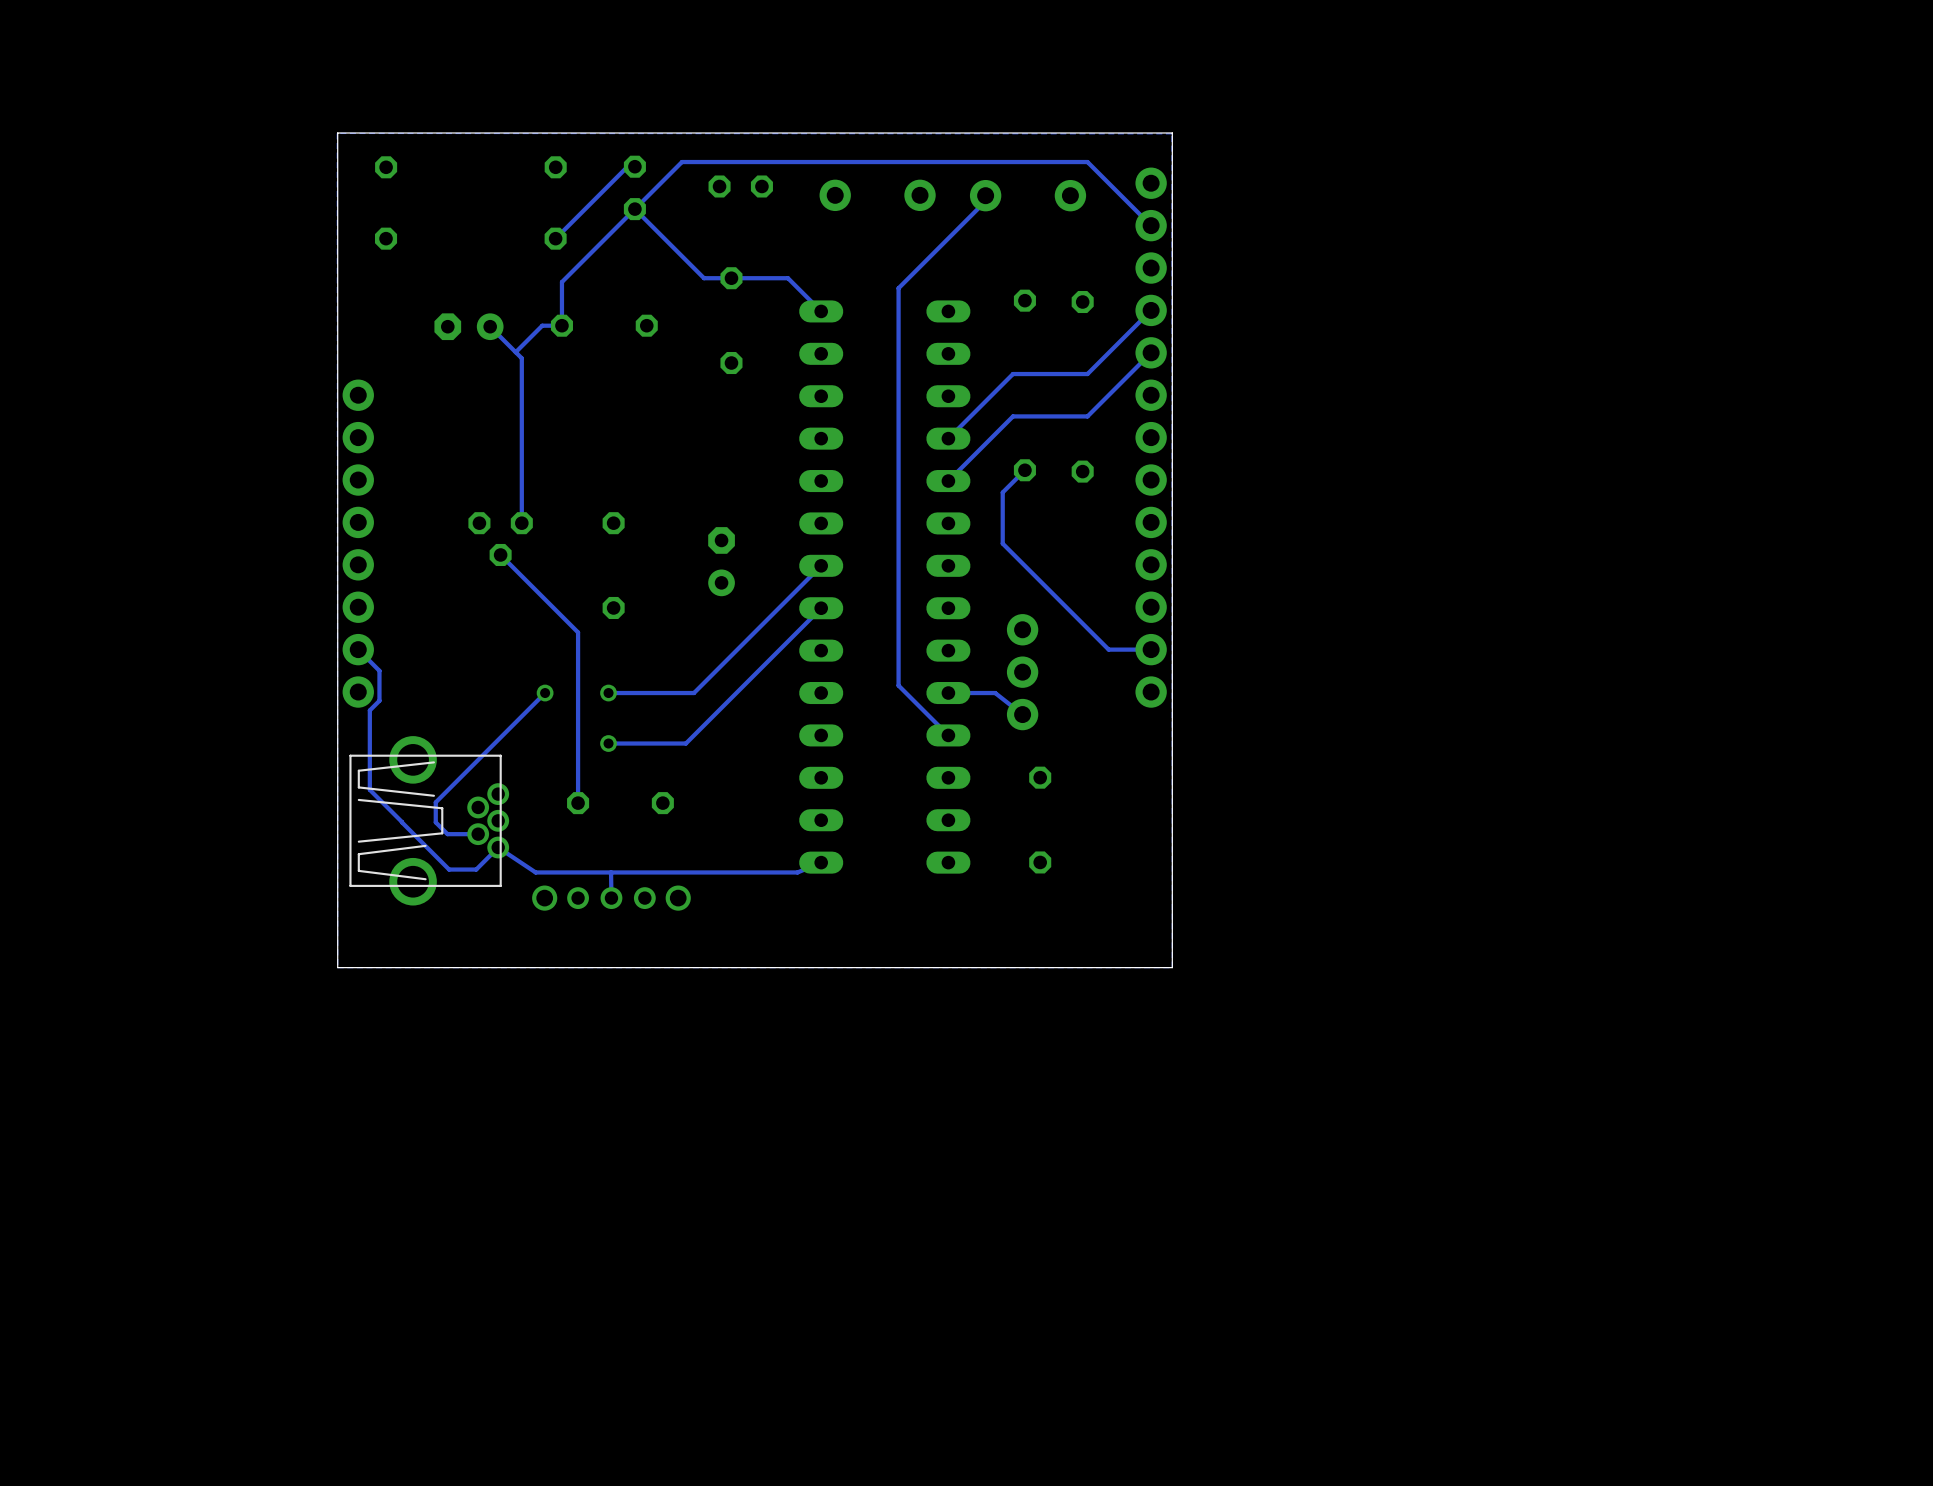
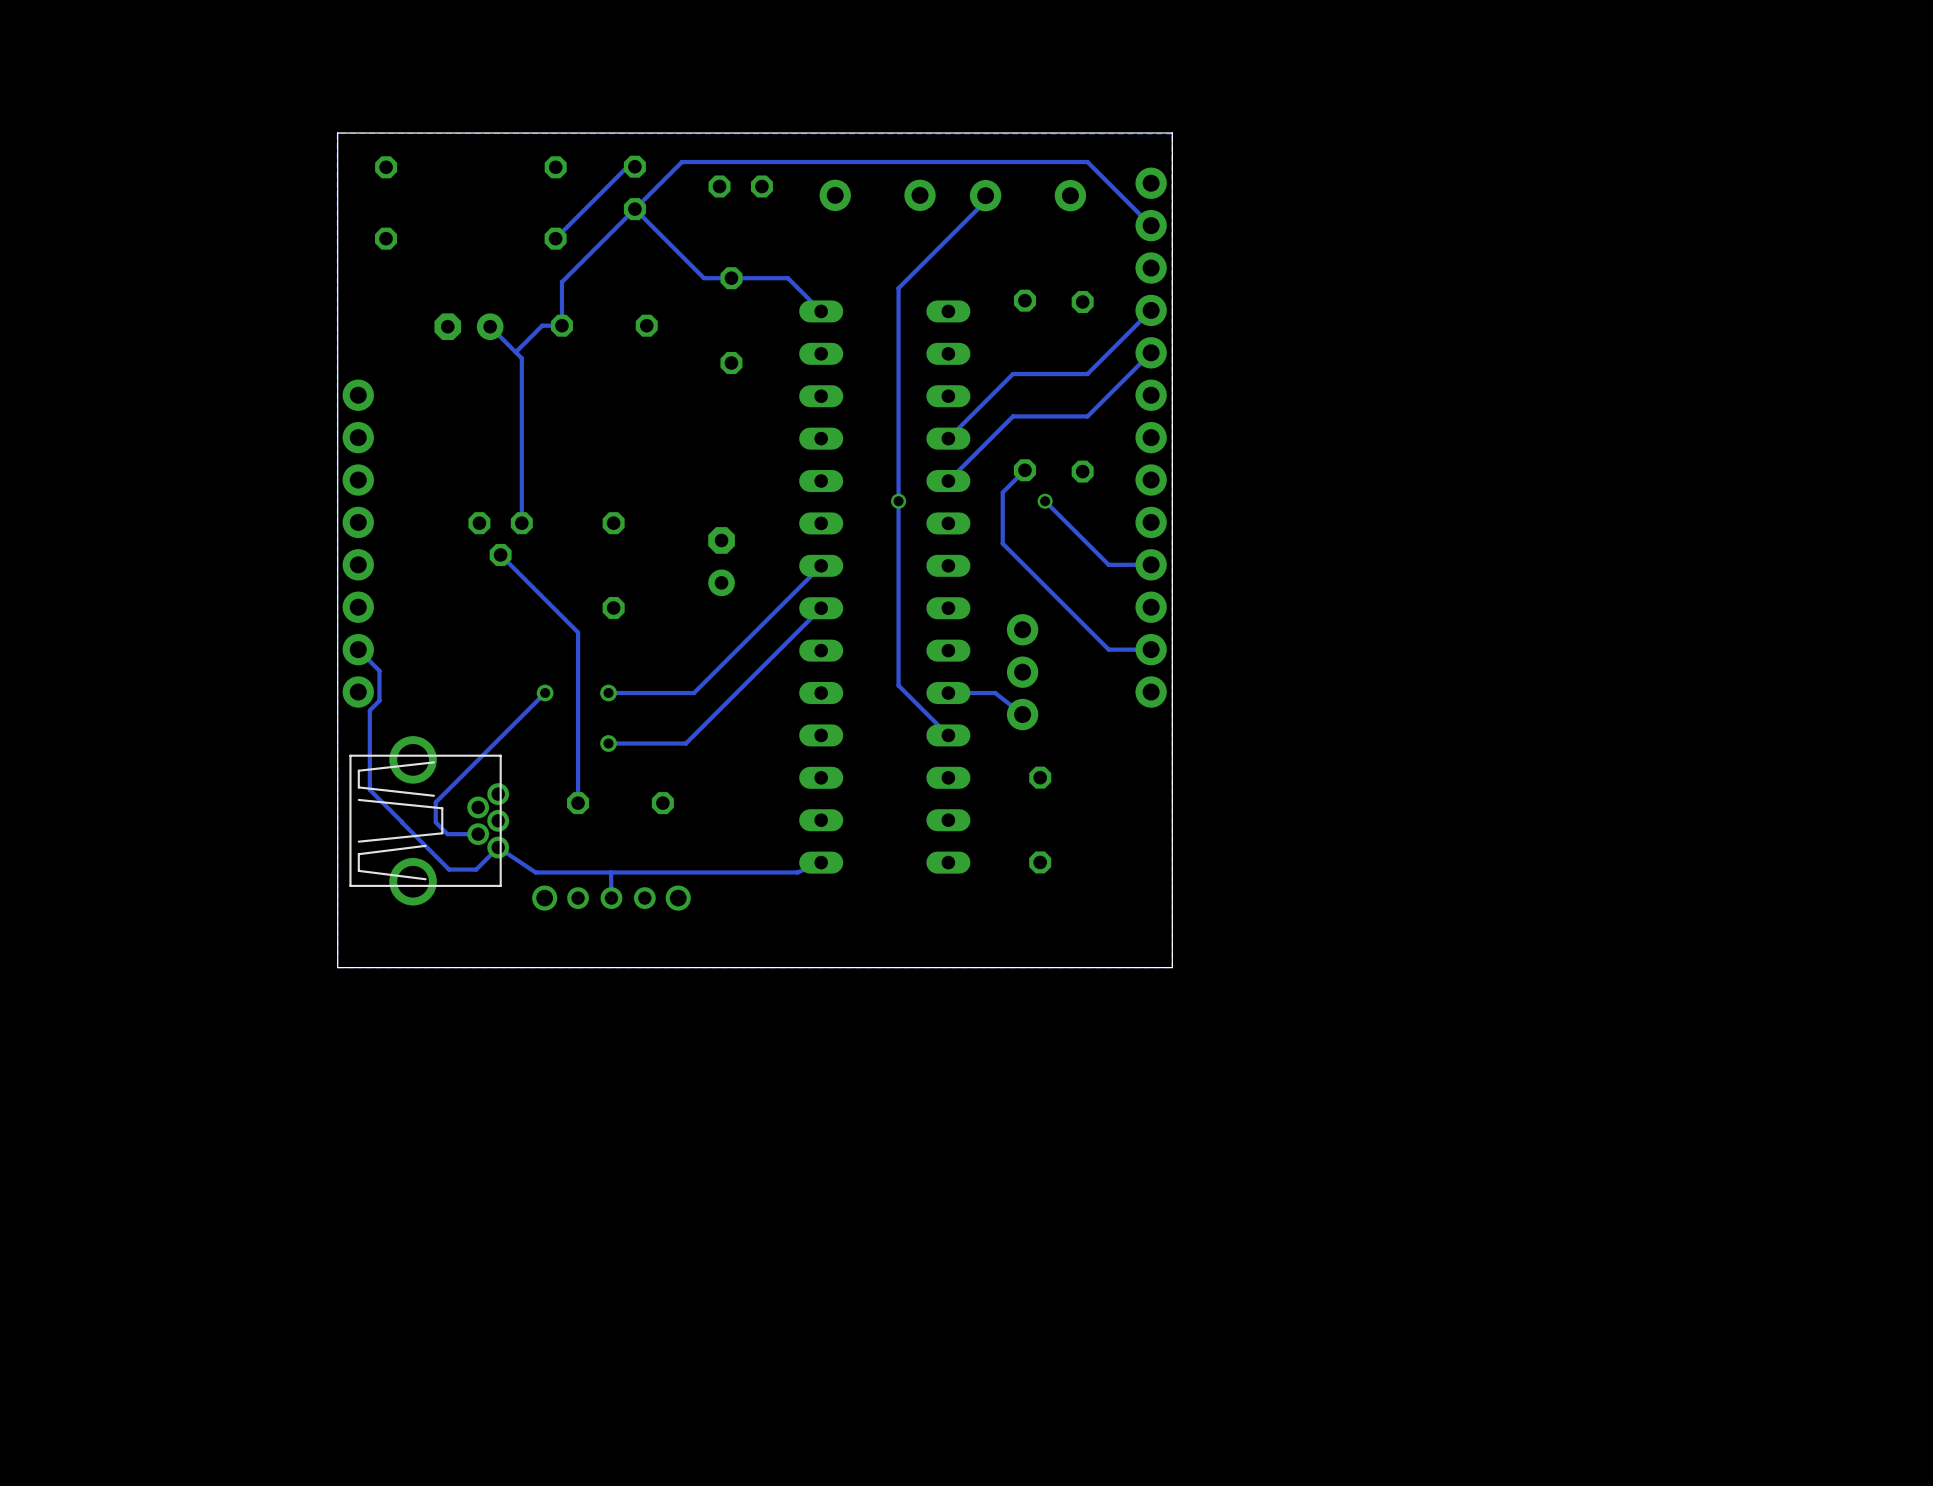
via: none -> (898, 501)
track: none -> (1045, 501) (1108, 564) (1151, 564)
via: none -> (1045, 501)

